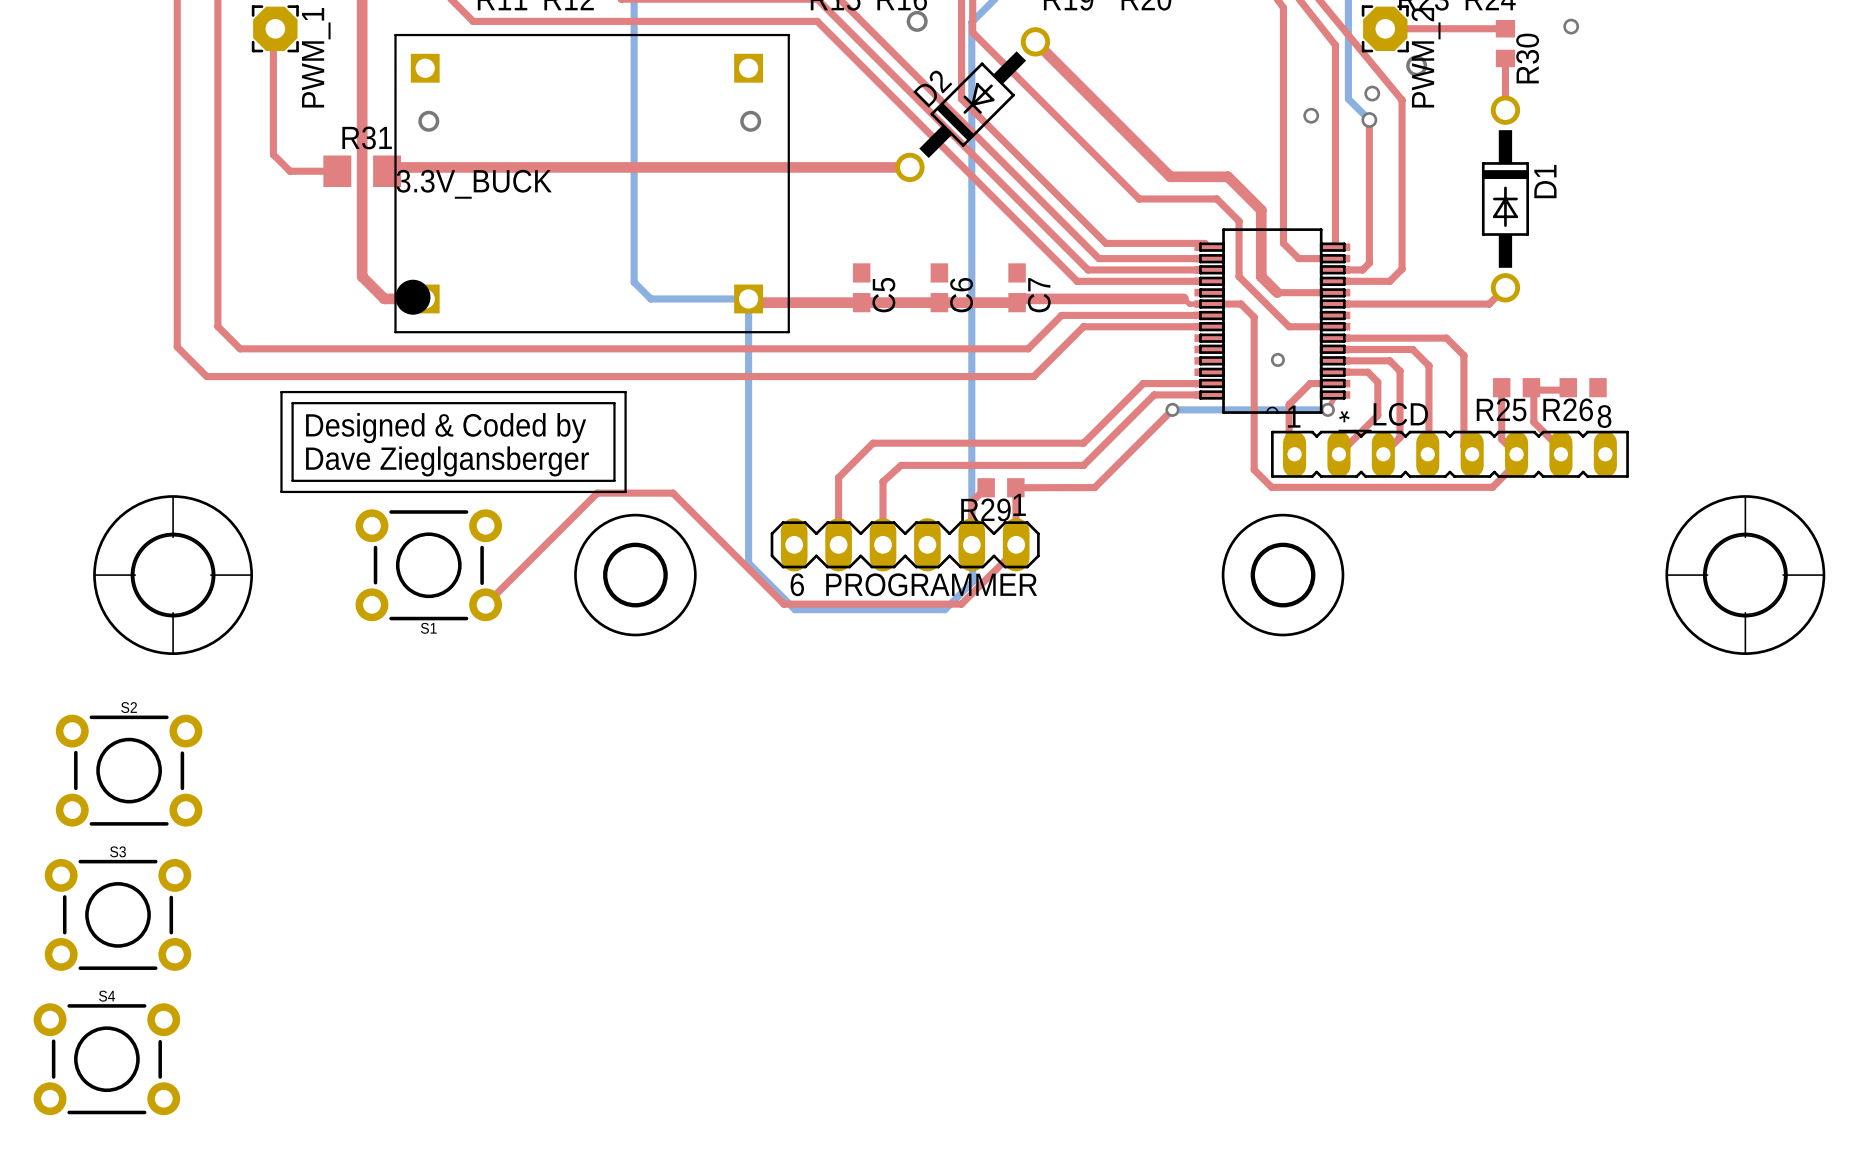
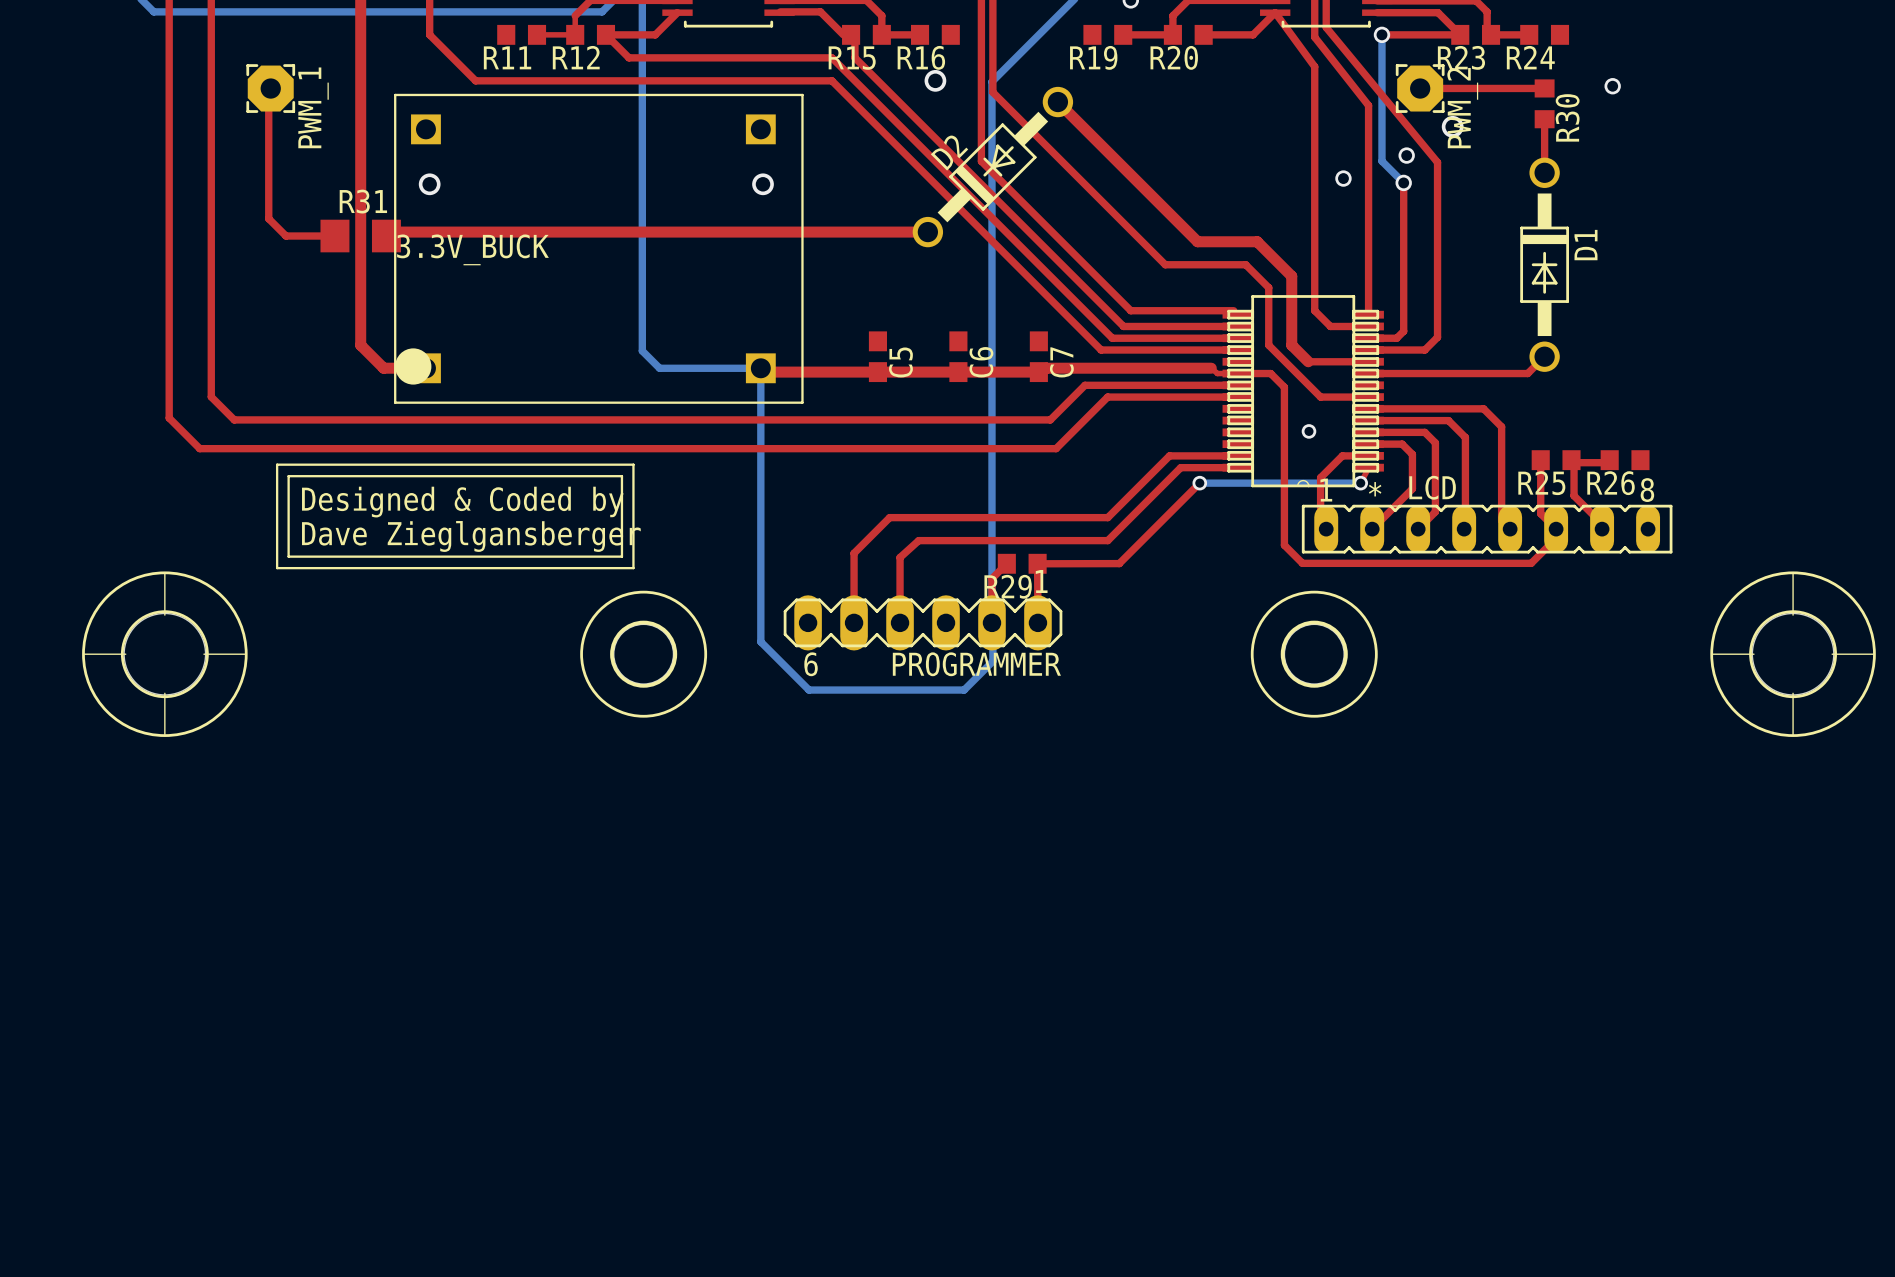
top track: (1016, 544) (1016, 549) (961, 604) (783, 604) (672, 493) (597, 493) (485, 604) -> none
S1: (428, 565) -> none
S2: (129, 770) -> none
S3: (118, 914) -> none
S4: (106, 1059) -> none

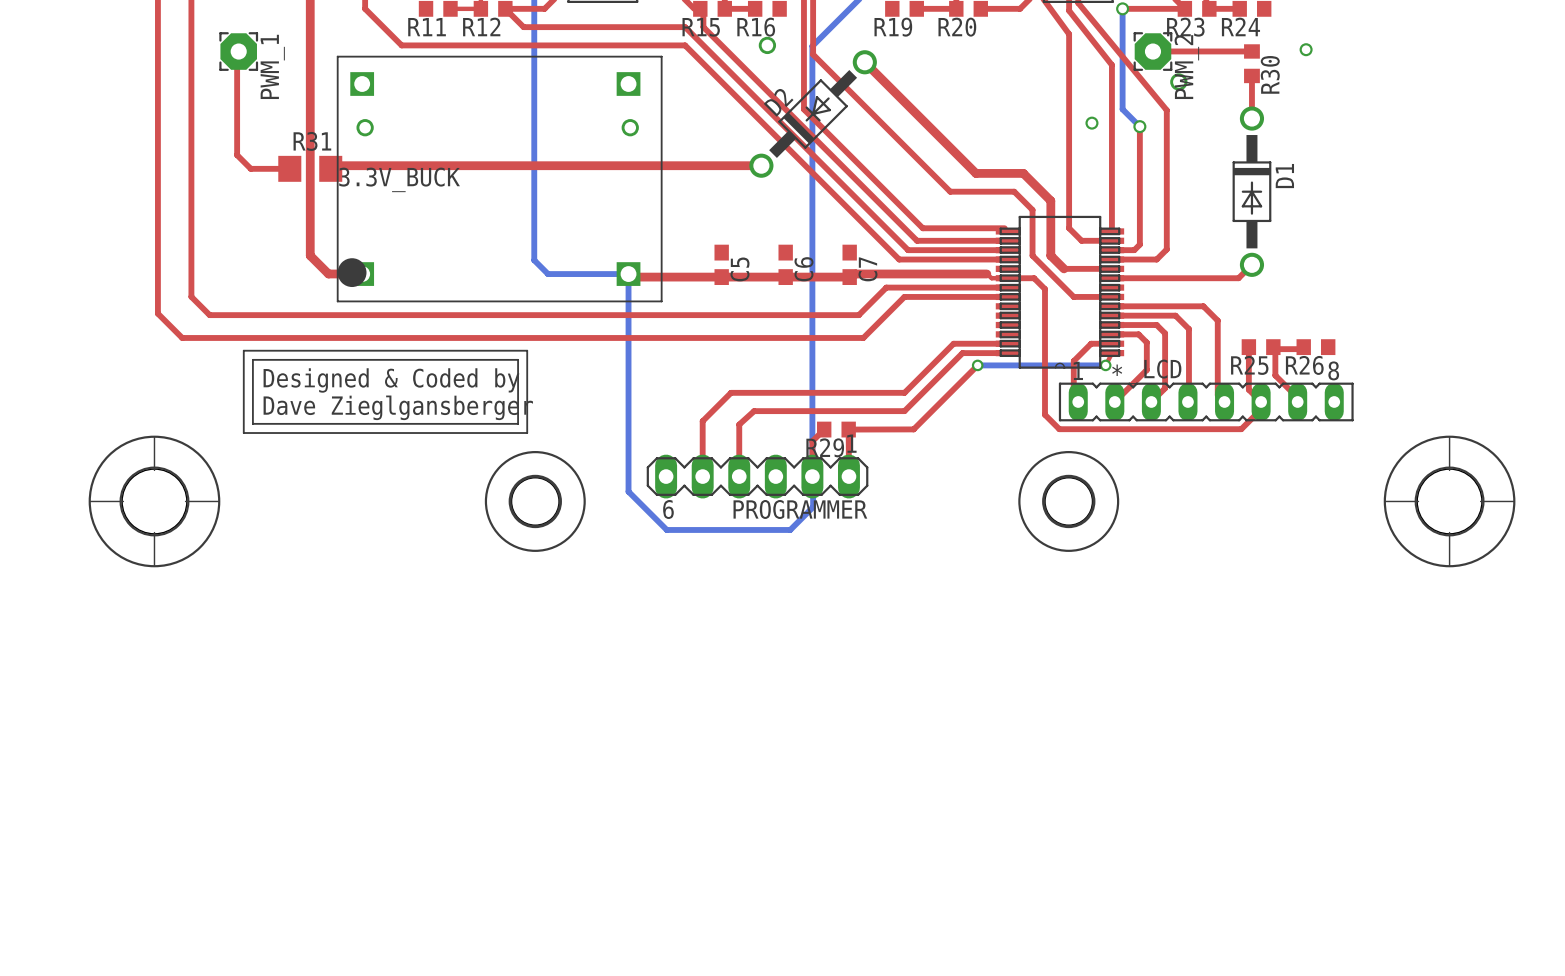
via: (1406, 155) -> none
via: (1308, 431) -> none

